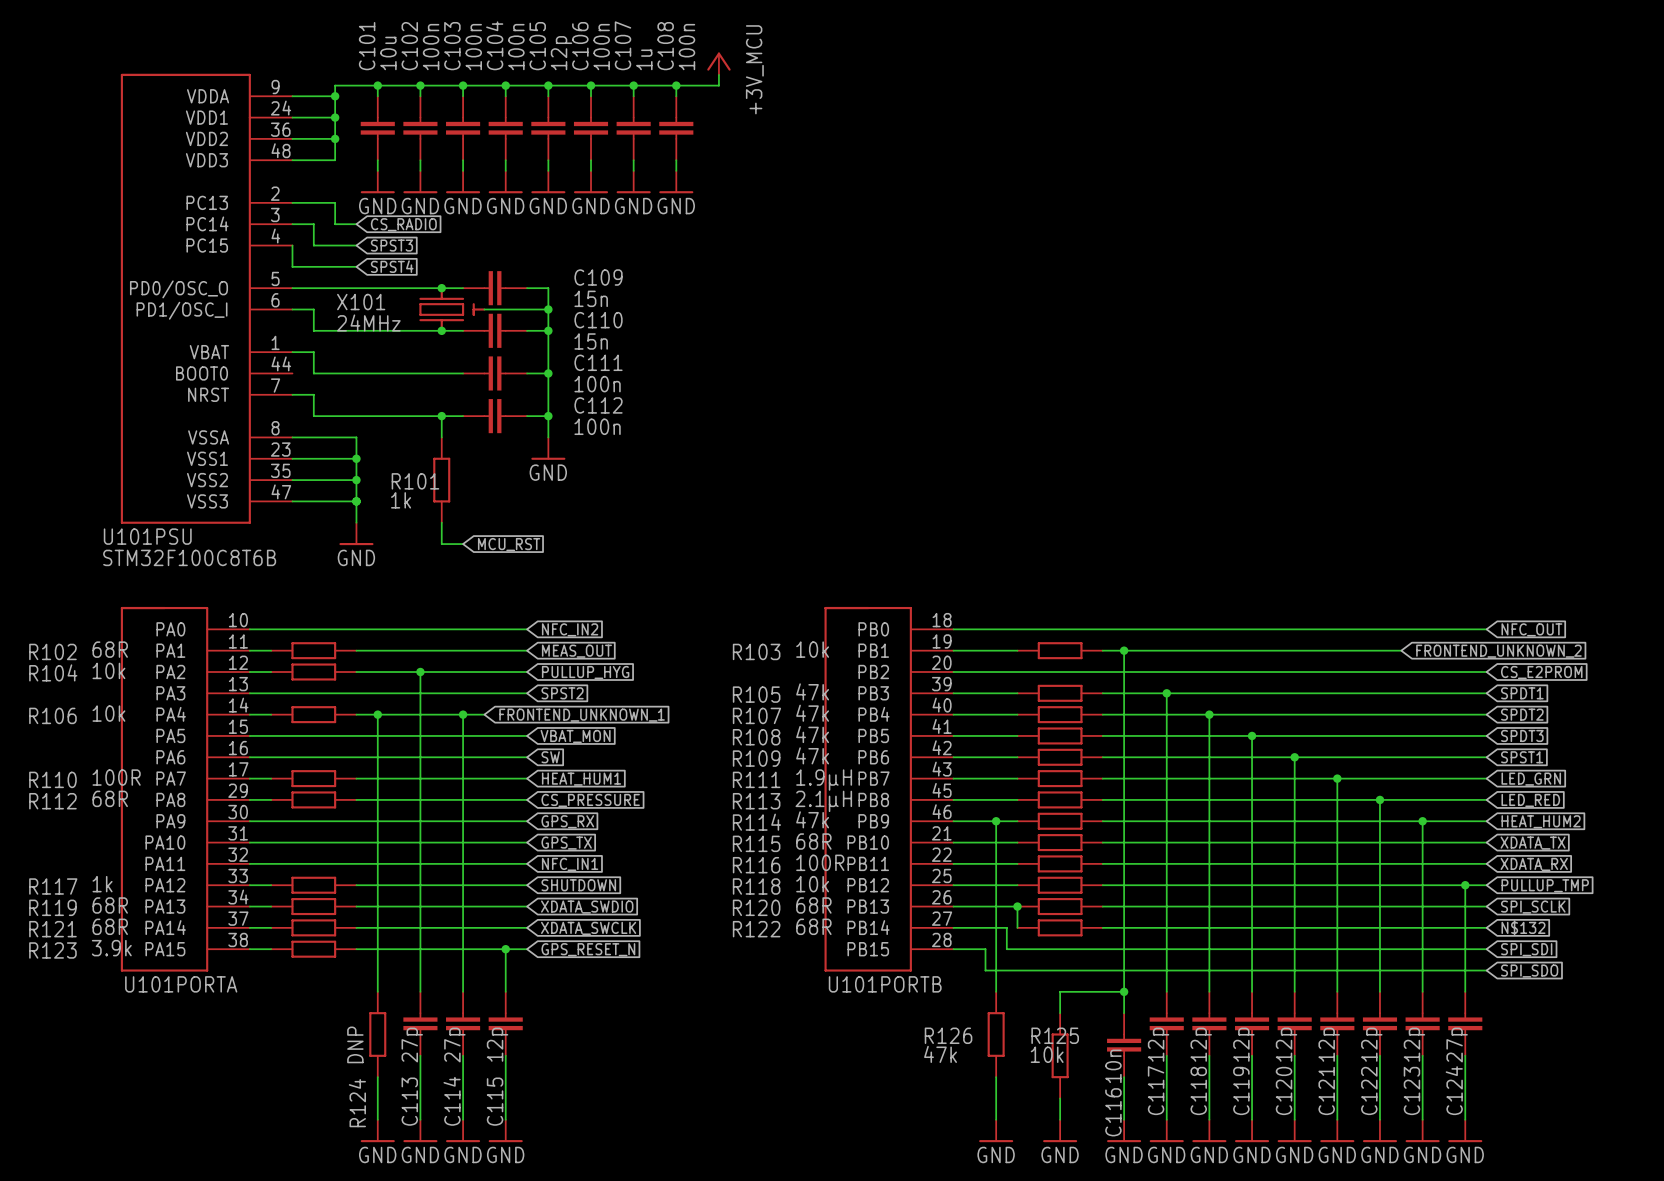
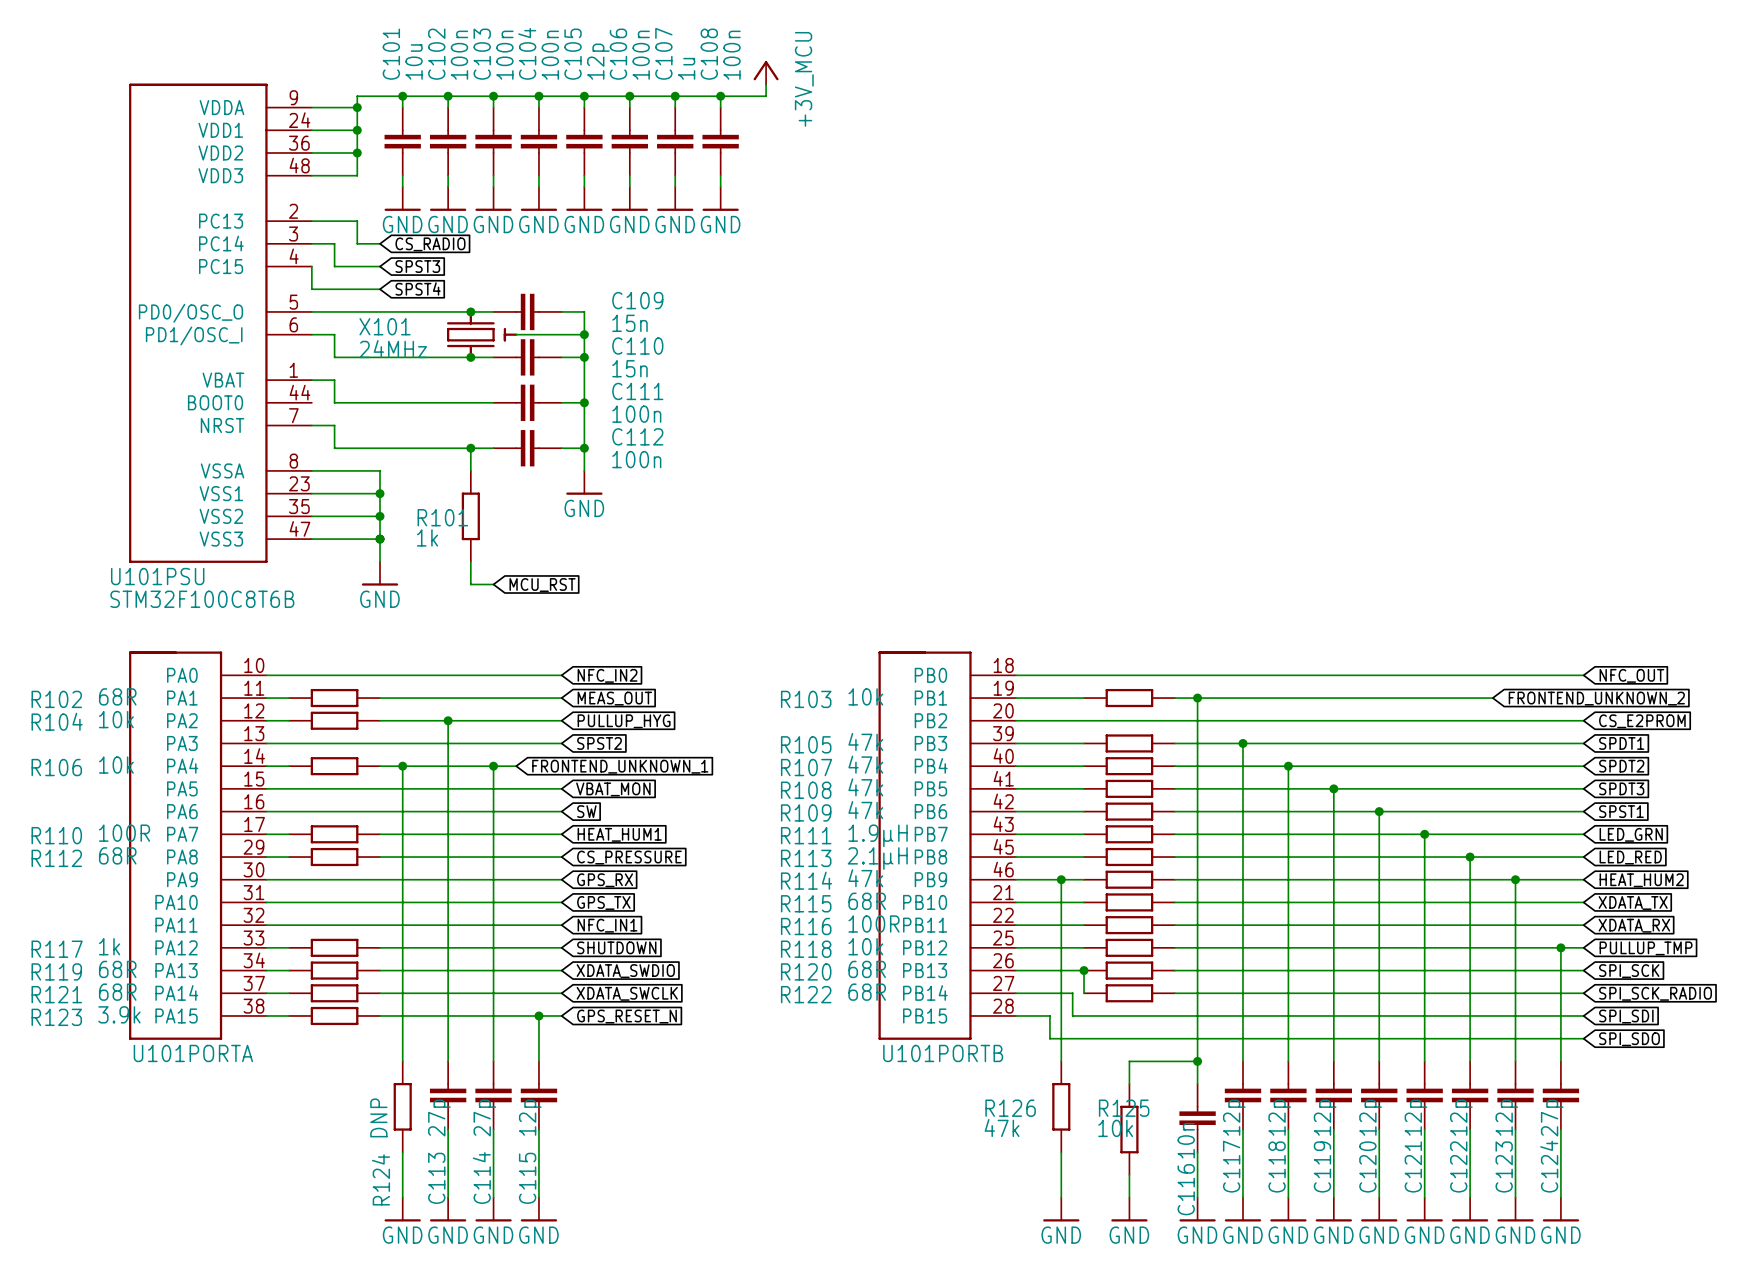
global label: SPI_SCLK (1533, 907) -> SPI_SCK (1629, 971)
global label: N$132 (1523, 927) -> SPI_SCK_RADIO (1655, 993)

